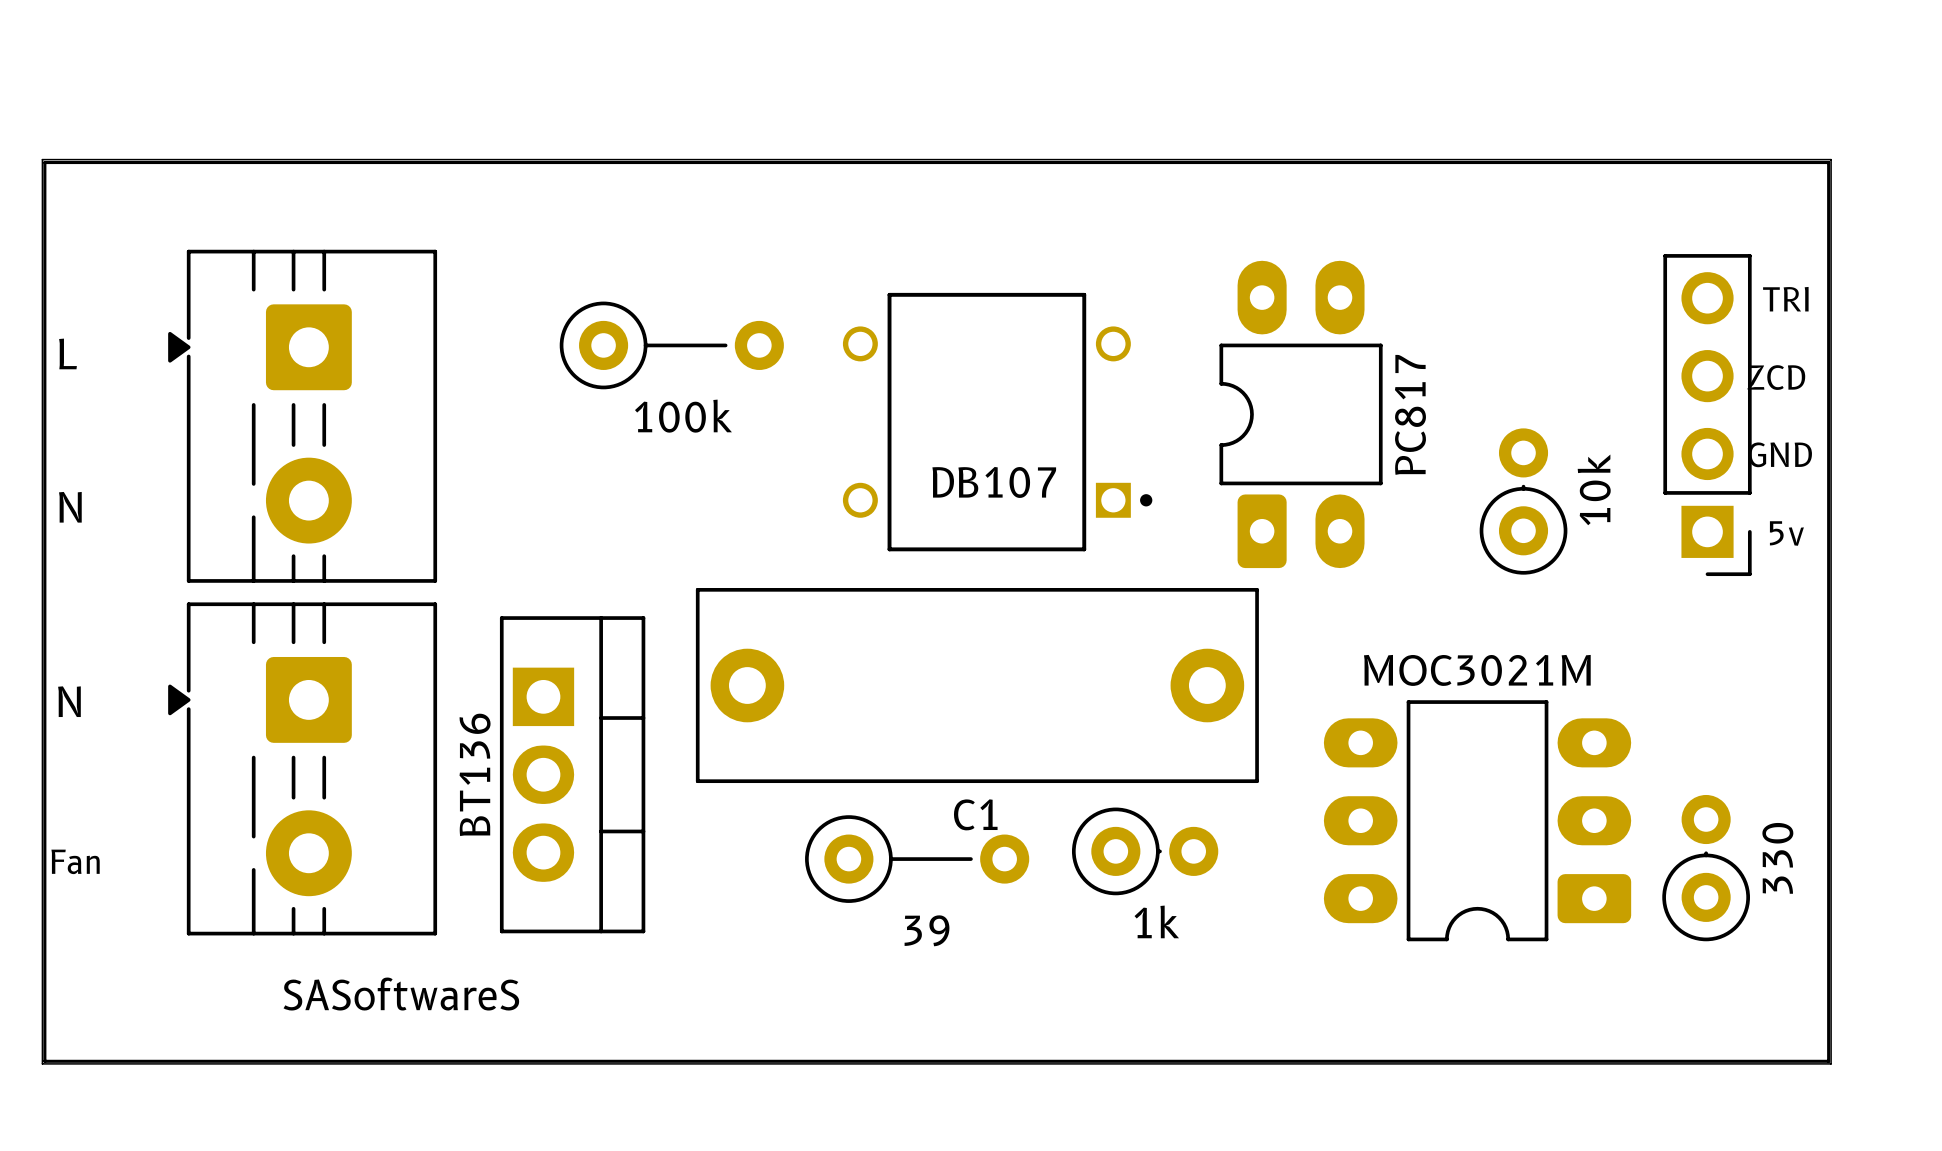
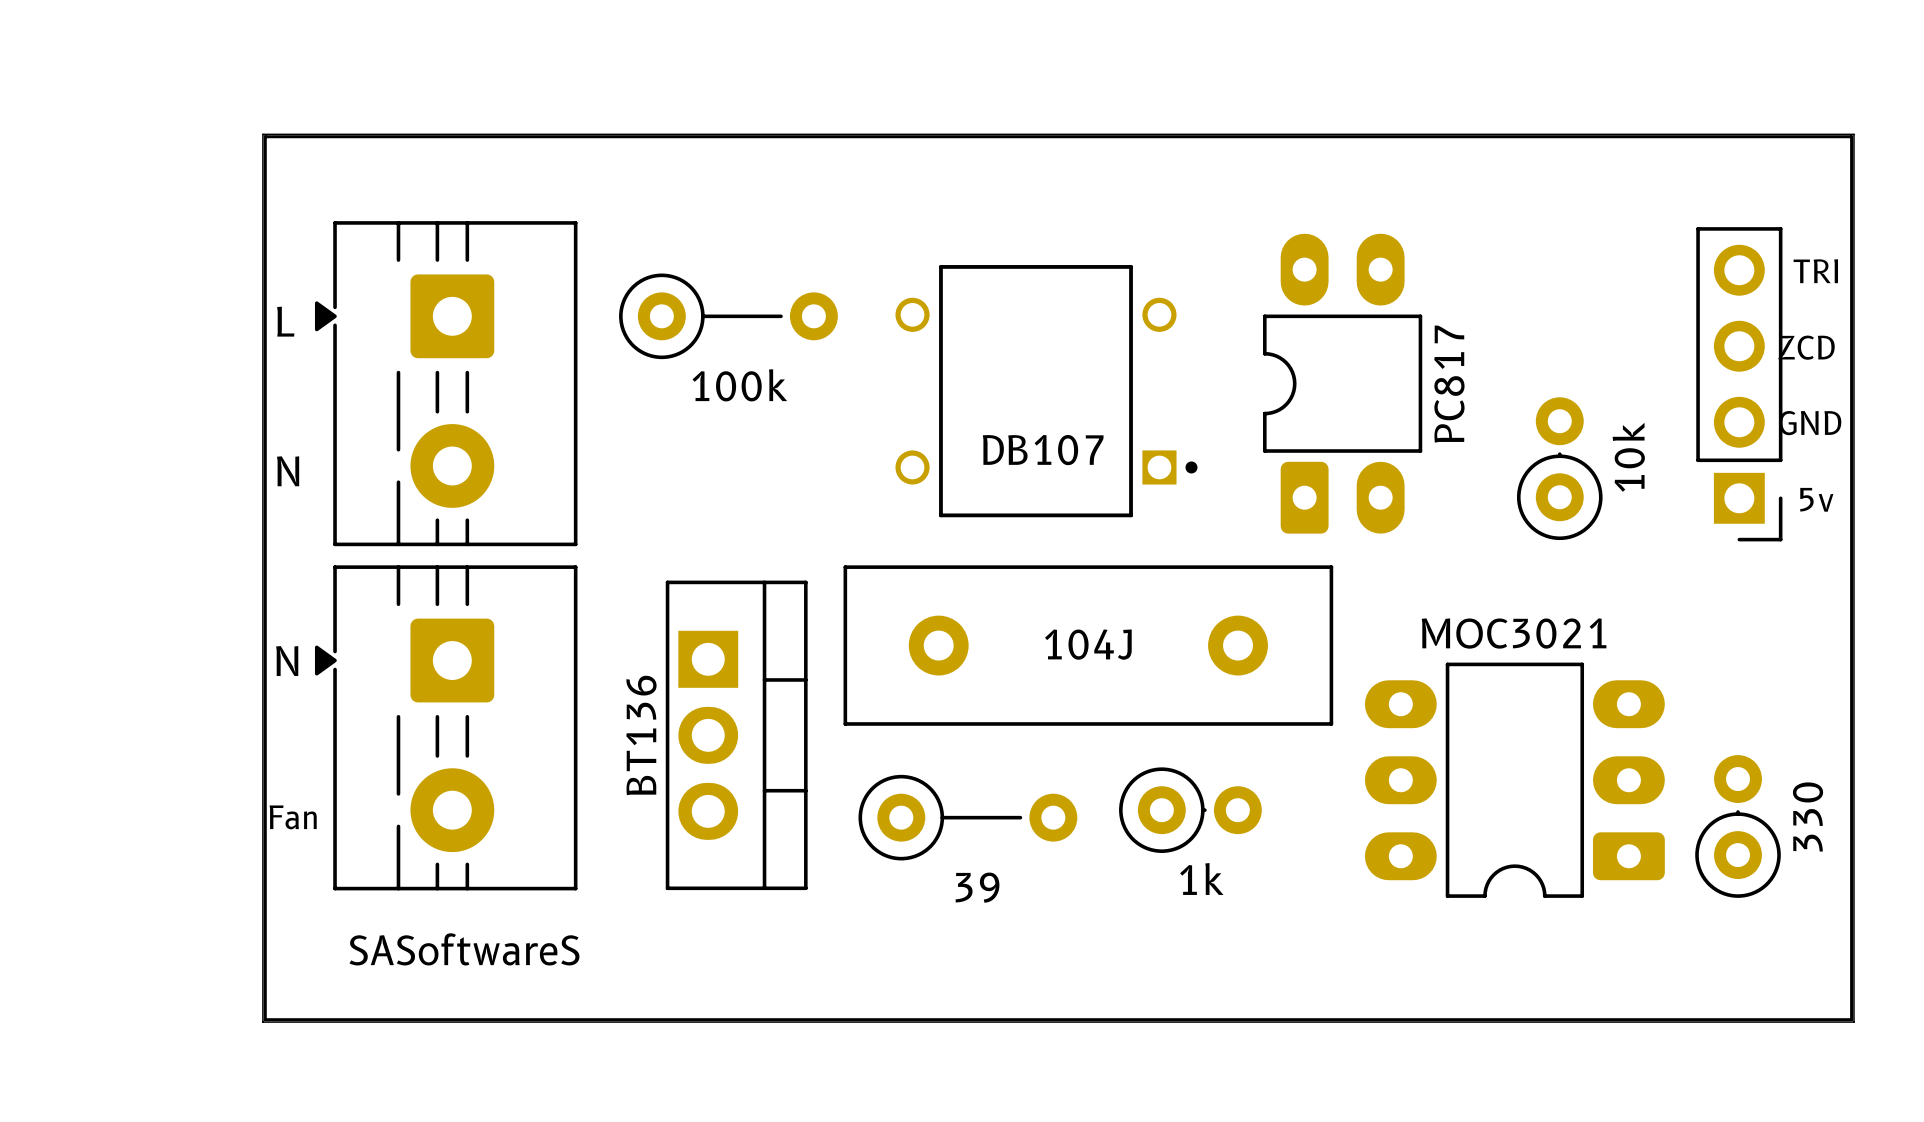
board edge: (42, 159) (1831, 159) (1831, 1063) (42, 1063) (42, 159) -> (262, 134) (262, 1022) (1853, 1022) (1853, 134) (262, 134)
line: (44, 162) (1828, 162) (1828, 1061) (44, 1061) (44, 162) -> (265, 136) (265, 1019) (1851, 1019) (1851, 136) (265, 136)
text position: L (68, 353) -> L (285, 321)
part position: (302, 416) -> (446, 383)
text: none -> N (288, 471)
text: N (70, 507) -> none
part value: MOC3021M (1477, 670) -> MOC3021 (1514, 633)
part: none -> 104J (1088, 645)
C1: (977, 685) -> none
text: none -> N (287, 661)
text: N (69, 701) -> none
part position: (302, 768) -> (446, 727)
part position: (572, 774) -> (736, 735)
text position: Fan (75, 861) -> Fan (293, 817)

